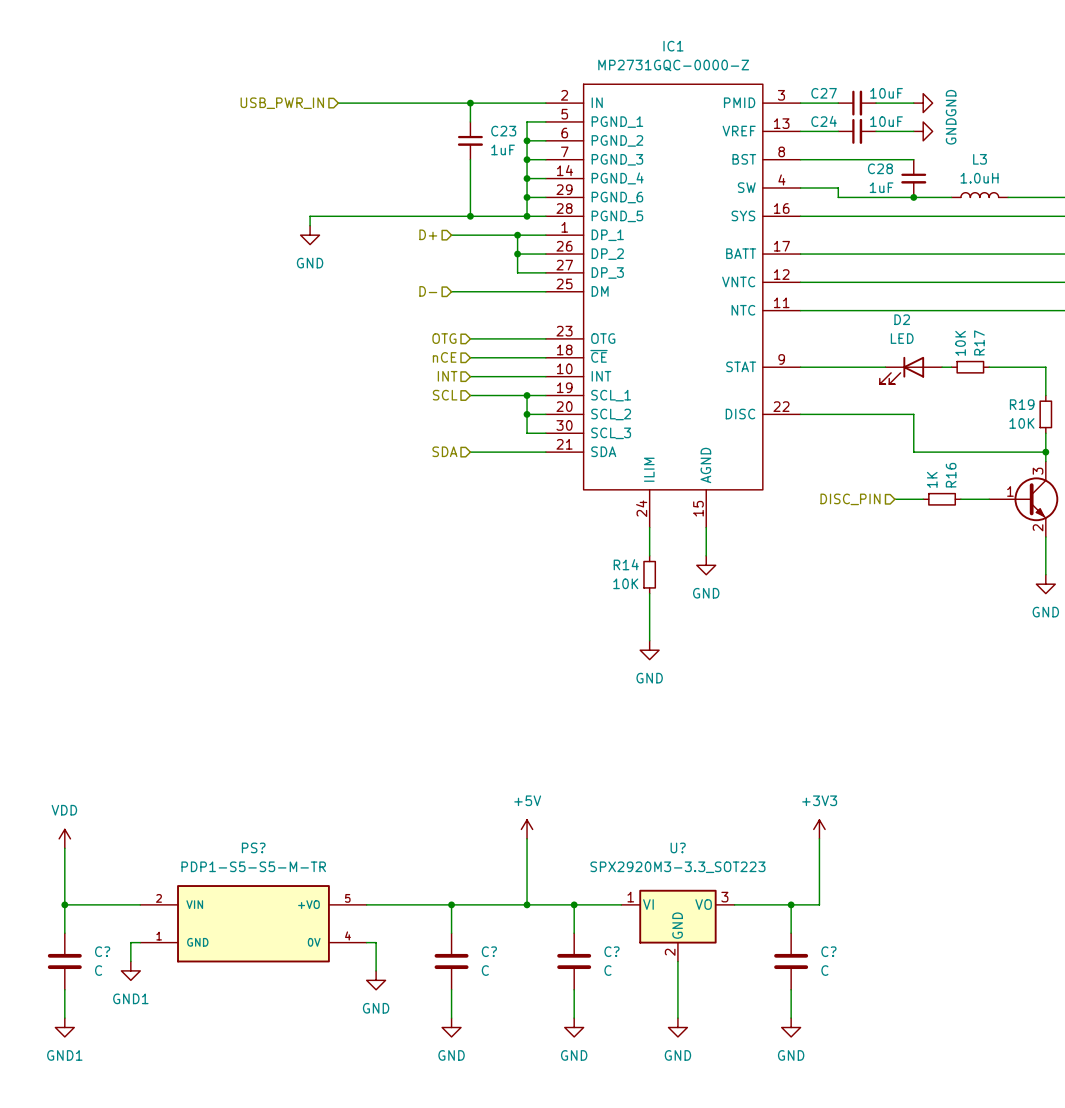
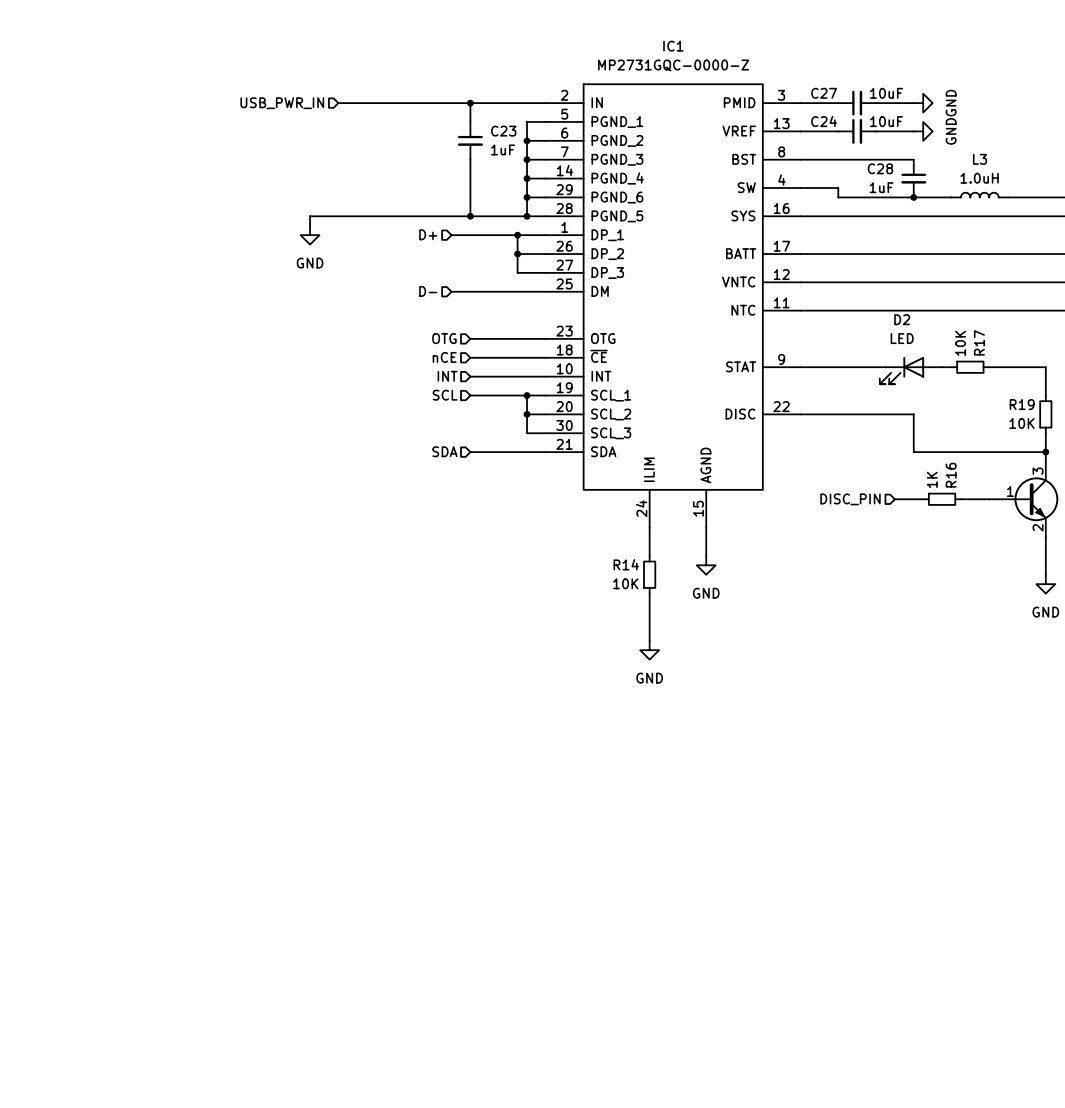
power symbol: +5V (527, 829) -> none
power symbol: +3V3 (819, 829) -> none
power symbol: VDD (64, 838) -> none
wire: (527, 838) (527, 904) -> none
wire: (819, 838) (819, 904) (734, 904) -> none
wire: (64, 848) (64, 933) -> none
wire: (64, 904) (140, 904) -> none
junction: (64, 904) -> none
wire: (366, 904) (621, 904) -> none
wire: (451, 904) (451, 933) -> none
junction: (451, 904) -> none
junction: (527, 904) -> none
wire: (574, 904) (574, 933) -> none
junction: (574, 904) -> none
wire: (791, 904) (791, 933) -> none
junction: (791, 904) -> none
PS?: PDP1-S5-S5-M-TR (253, 923) -> none
U?: SPX2920M3-3.3_SOT223 (677, 925) -> none
wire: (140, 942) (130, 942) (130, 961) -> none
wire: (366, 942) (376, 942) (376, 970) -> none
C?: C (64, 961) -> none
C?: C (451, 961) -> none
C?: C (574, 961) -> none
wire: (677, 961) (677, 1018) -> none
C?: C (791, 961) -> none
power symbol: GND1 (130, 970) -> none
power symbol: GND (376, 980) -> none
wire: (64, 989) (64, 1018) -> none
wire: (451, 989) (451, 1018) -> none
wire: (574, 989) (574, 1018) -> none
wire: (791, 989) (791, 1018) -> none
power symbol: GND1 (64, 1027) -> none
power symbol: GND (451, 1027) -> none
power symbol: GND (574, 1027) -> none
power symbol: GND (677, 1027) -> none
power symbol: GND (791, 1027) -> none

